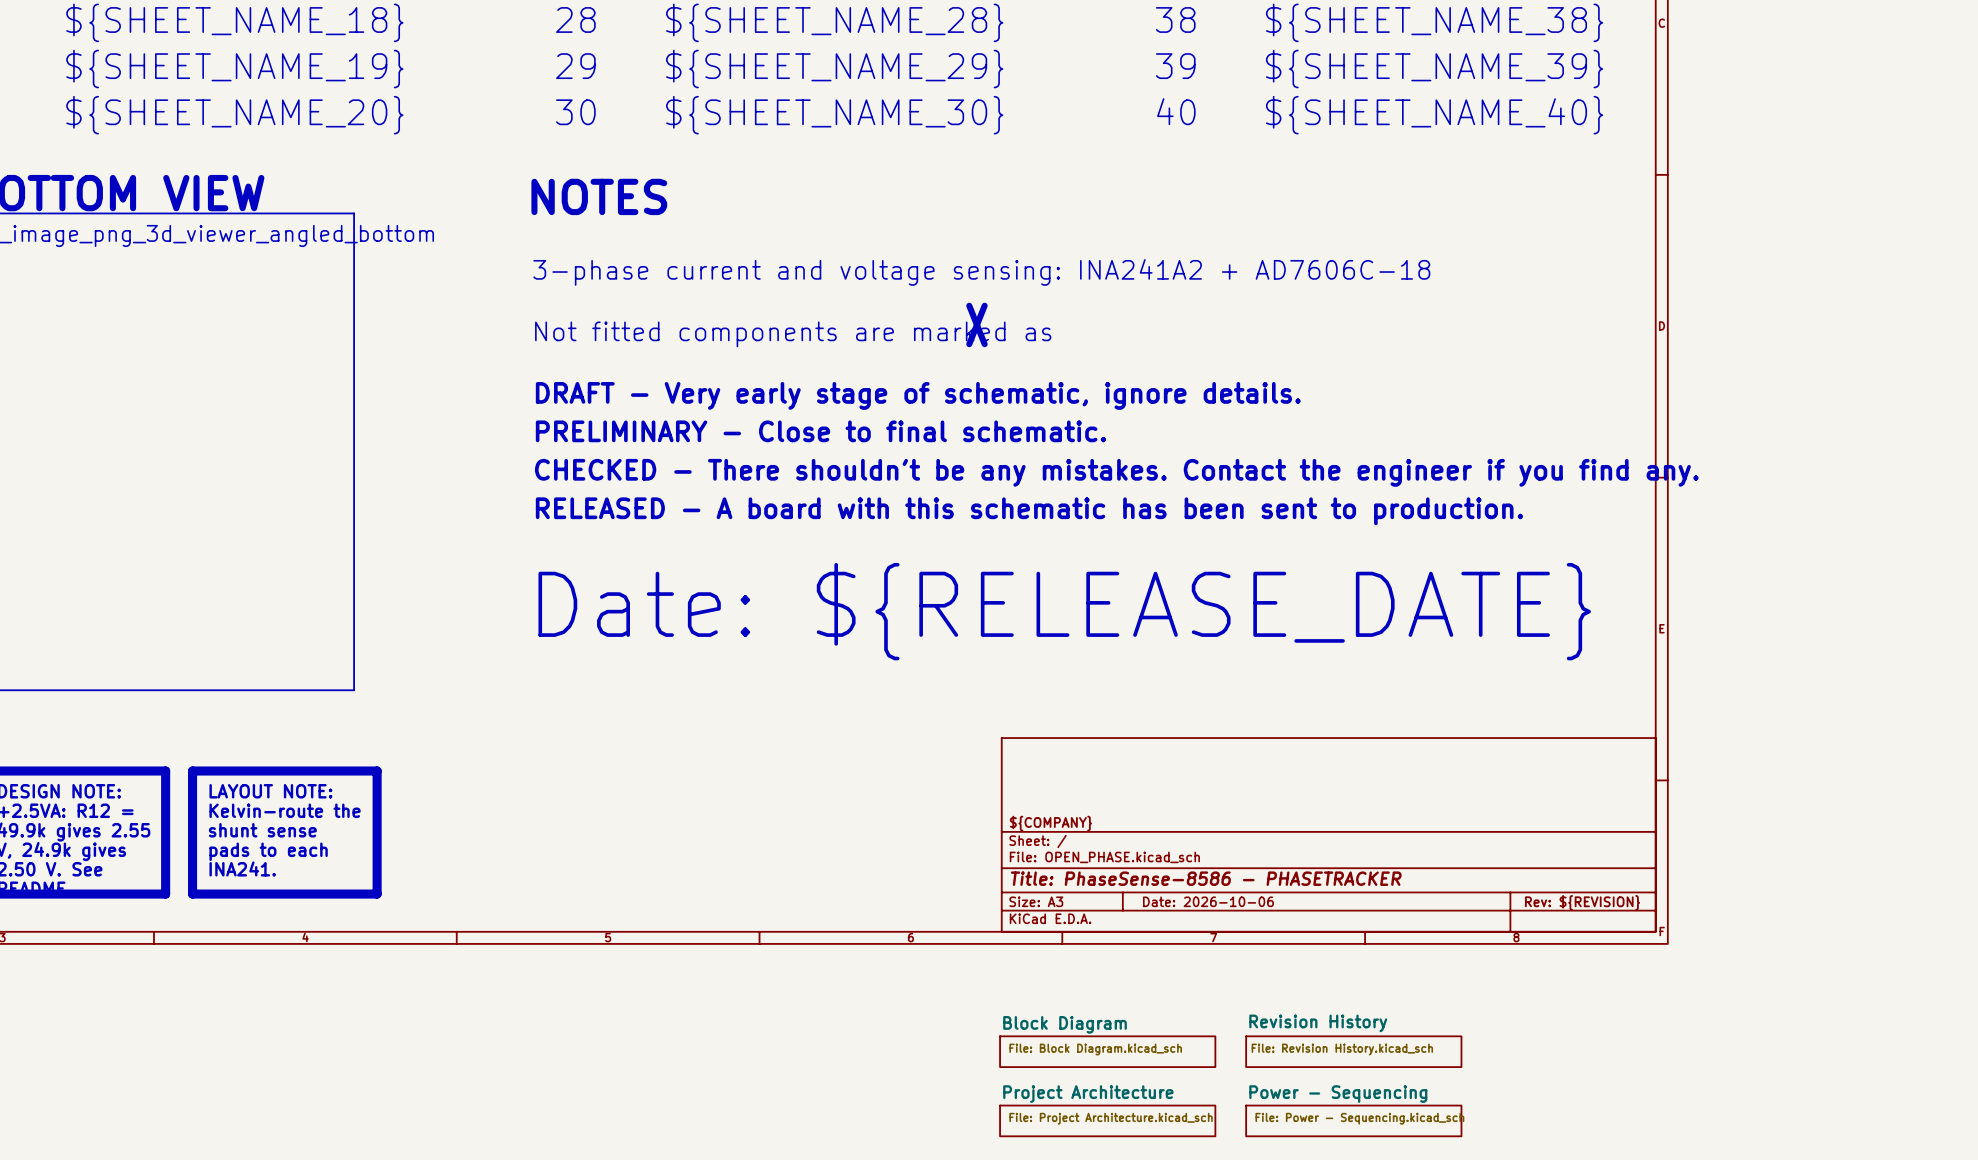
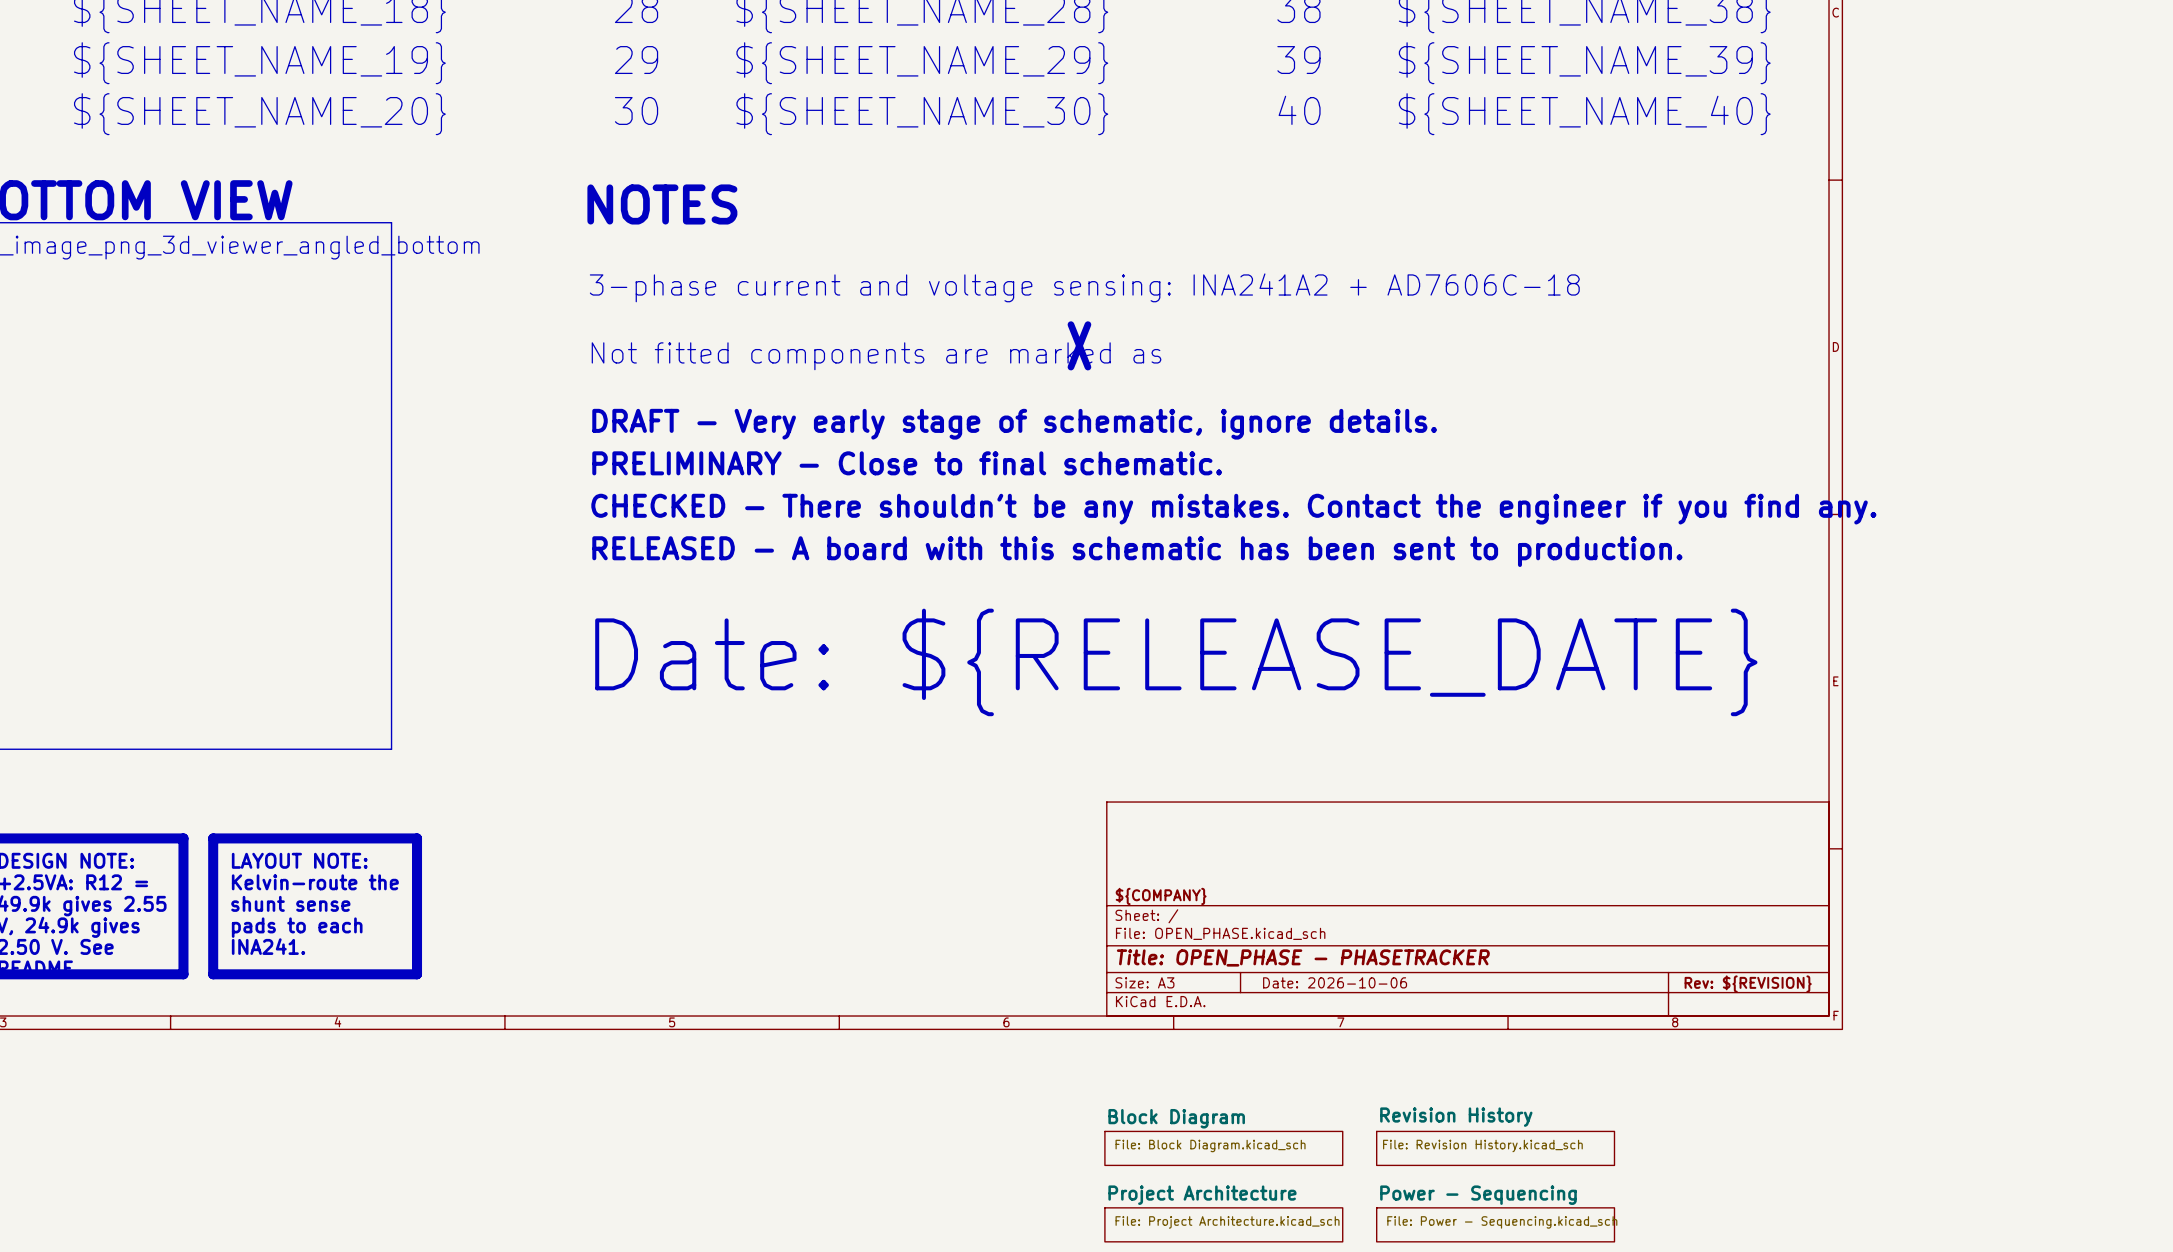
title block: Title: PhaseSense-8586 - PHASETRACKER (1206, 878) -> Title: OPEN_PHASE - PHASETRACKER (1303, 957)

